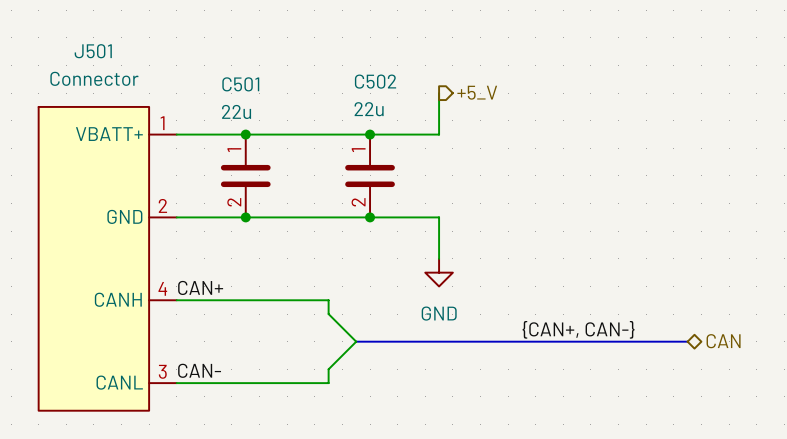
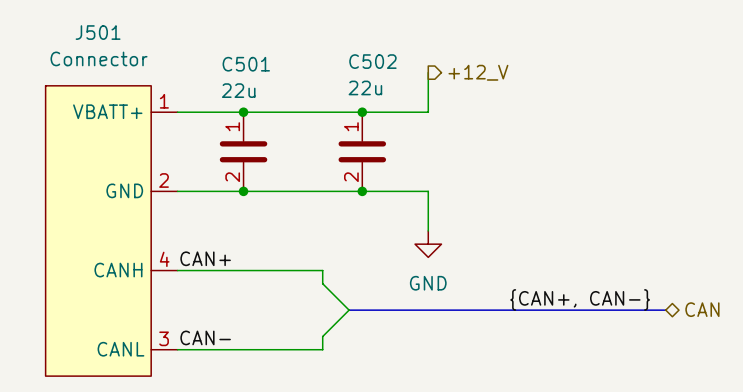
hierarchical label: +5_V (477, 92) -> +12_V (478, 72)

